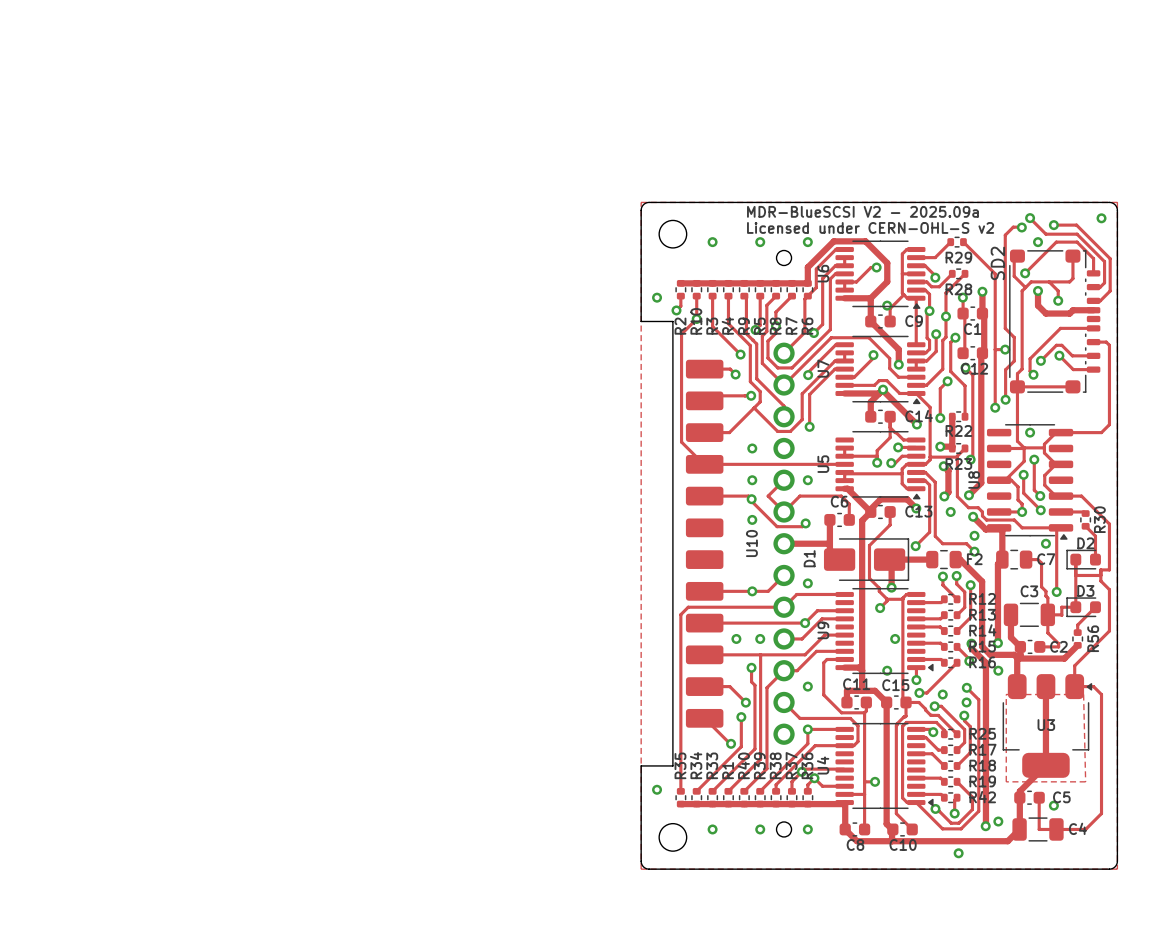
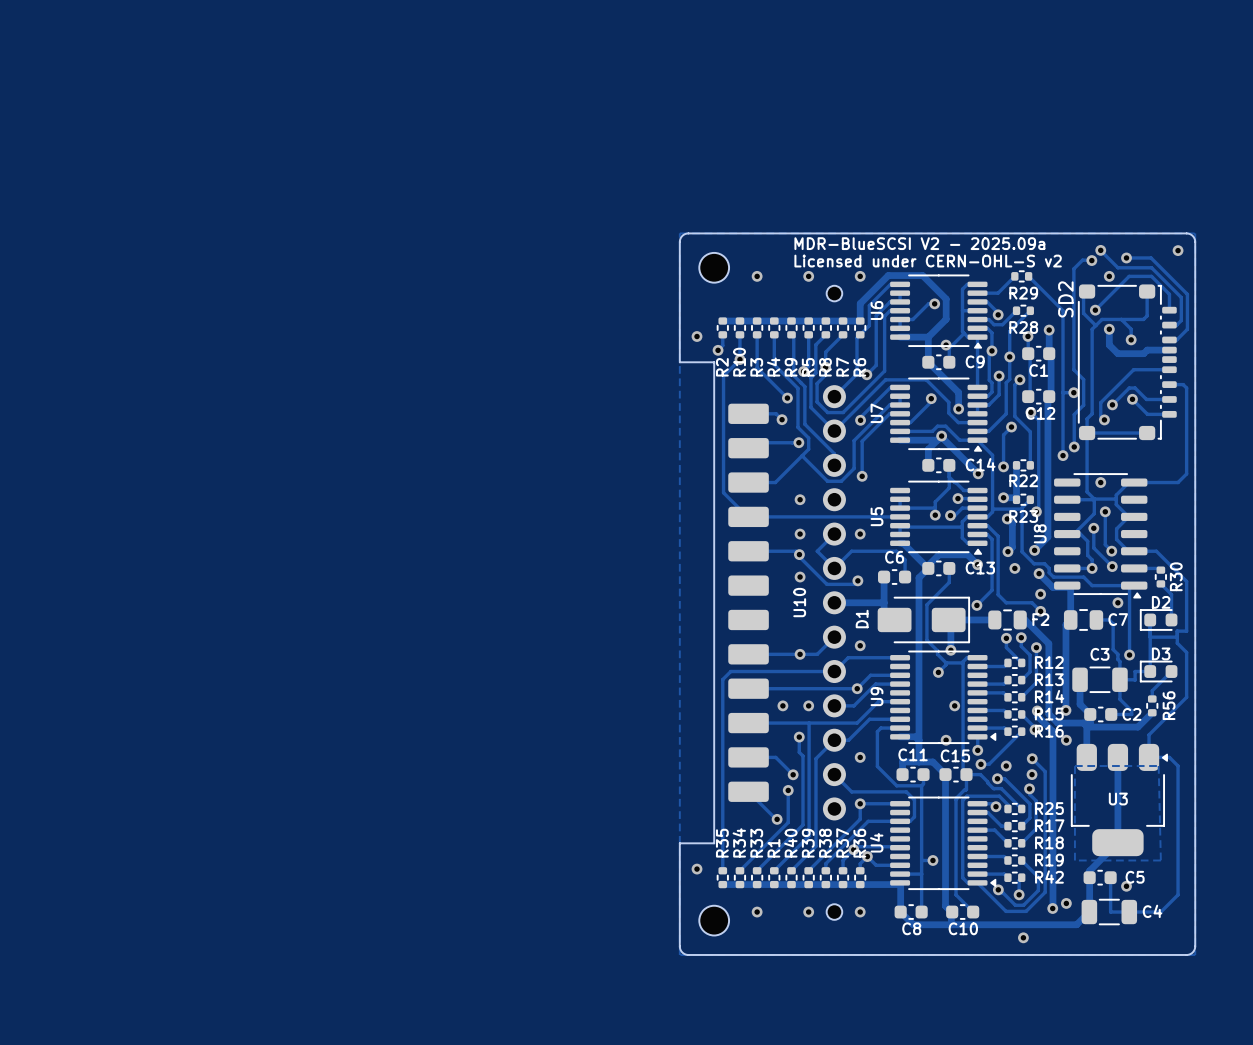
round board edge: [775, 249, 793, 267] -> none
part: none -> (834, 293)
round board edge: [775, 821, 793, 838] -> none
part: none -> (834, 912)

